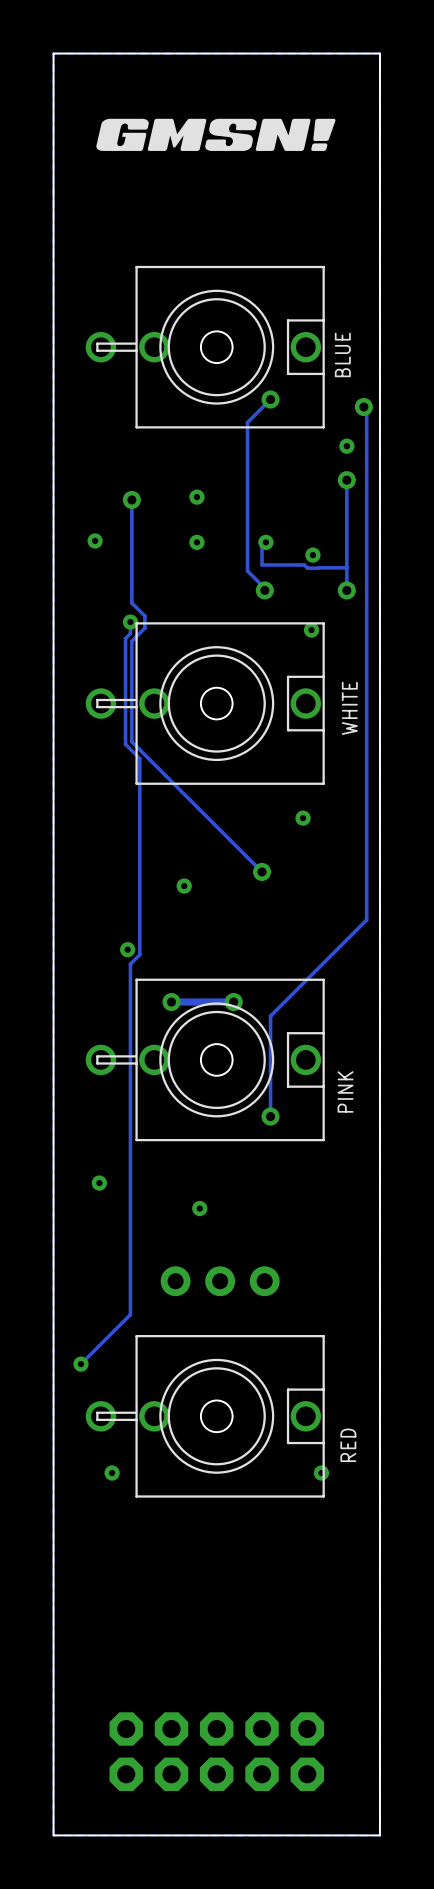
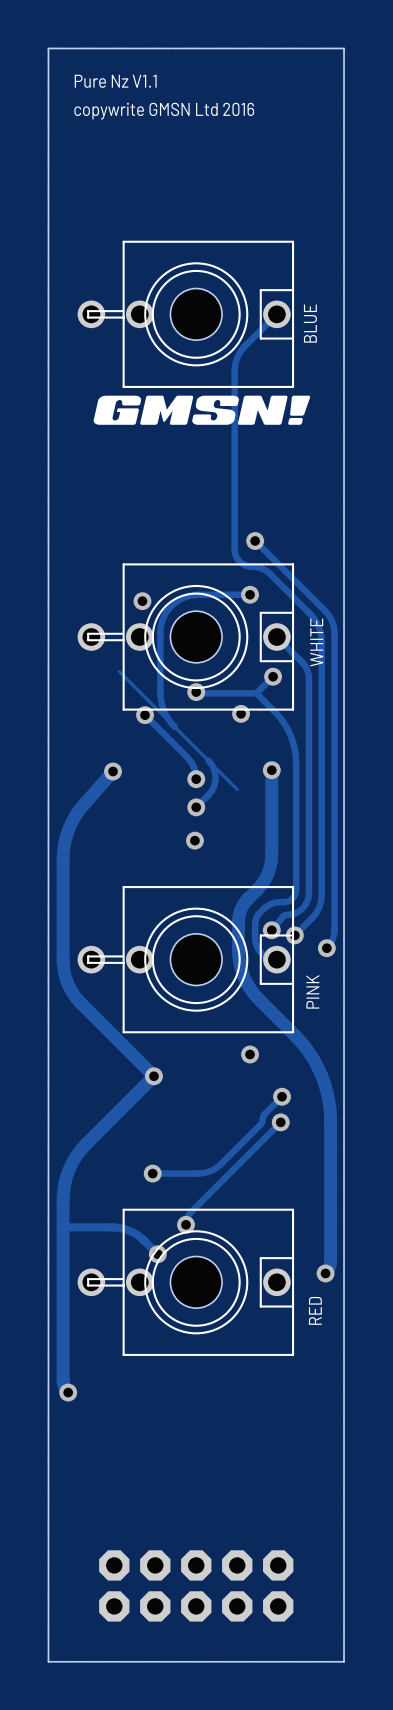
text: none -> Pure Nz V1.1 (115, 81)
text: none -> copywrite GMSN Ltd 2016 (164, 111)
drawing position: (215, 134) -> (201, 410)
BLUE footprint: [85, 265, 325, 429] -> [77, 240, 295, 388]
hole: none -> (196, 314)
track: none -> (276, 314) (241, 349) (234, 366) (234, 549) (236, 557) (241, 563) (267, 572) (310, 613) (316, 622) (321, 636) (321, 899) (314, 915) (294, 935)
track: (270, 399) (247, 422) (247, 570) (264, 590) -> none
via: (270, 399) -> none
track: (363, 406) (366, 409) (366, 919) (270, 1016) (270, 1116) -> none
via: (363, 406) -> none
via: (346, 446) -> none
track: (346, 480) (346, 590) -> none
via: (346, 480) -> none
via: (196, 497) -> none
track: (131, 499) (131, 603) (144, 616) (144, 628) (131, 641) (131, 741) -> none
via: (131, 499) -> none
via: (95, 540) -> none
via: (196, 542) -> none
track: (265, 542) (262, 546) (262, 564) (304, 564) (307, 568) (346, 567) -> none
via: (265, 542) -> none
via: (312, 555) -> none
via: (264, 590) -> none
via: (346, 590) -> none
track: none -> (255, 540) (325, 611) (333, 627) (334, 929) (332, 939) (326, 948)
via: none -> (255, 540)
WHITE footprint: [85, 622, 325, 785] -> [77, 563, 295, 711]
track: (130, 622) (130, 633) (125, 638) (125, 744) (139, 758) (139, 954) (130, 964) (130, 1314) (80, 1364) -> none
via: (130, 622) -> none
via: (311, 630) -> none
track: none -> (250, 594) (188, 596) (175, 602) (165, 613) (160, 632) (160, 698) (164, 711) (174, 726)
via: none -> (250, 594)
via: none -> (142, 601)
hole: none -> (196, 637)
track: none -> (276, 637) (303, 663) (308, 676) (308, 893) (307, 901) (302, 908) (295, 913) (283, 916) (271, 930)
track: none -> (273, 676) (256, 693)
via: none -> (273, 676)
track: none -> (196, 692) (256, 693)
via: none -> (196, 692)
track: none -> (256, 693) (283, 722) (290, 735) (295, 755) (295, 893) (288, 901) (274, 902) (265, 907) (258, 914) (255, 922) (255, 940) (258, 948) (266, 956) (276, 959)
via: none -> (241, 713)
track: none -> (145, 715) (189, 760) (193, 767) (196, 779)
via: none -> (145, 715)
via: (303, 818) -> none
track: none -> (208, 760) (214, 771) (214, 784) (210, 792) (196, 807)
track: none -> (271, 770) (271, 861) (265, 879) (244, 902) (239, 913) (238, 956) (243, 976) (250, 988) (307, 1049) (321, 1074) (327, 1093) (330, 1121) (330, 1261) (325, 1273)
via: none -> (271, 770)
track: none -> (113, 771) (76, 813) (66, 835) (63, 859) (63, 968) (67, 983) (75, 997) (153, 1076) (81, 1149) (72, 1162) (66, 1177) (63, 1200) (63, 1380) (68, 1392)
via: none -> (113, 771)
via: none -> (196, 779)
via: (262, 871) -> none
via: (184, 886) -> none
via: none -> (196, 807)
via: none -> (194, 840)
via: (127, 949) -> none
PINK footprint: [85, 978, 325, 1142] -> [77, 886, 295, 1034]
via: (171, 1002) -> none
track: (233, 1002) (171, 1002) -> none
via: (233, 1002) -> none
via: none -> (271, 930)
via: none -> (294, 935)
via: none -> (326, 948)
hole: none -> (196, 959)
via: (270, 1116) -> none
via: none -> (250, 1054)
via: (99, 1183) -> none
via: none -> (153, 1076)
via: (199, 1208) -> none
track: none -> (282, 1096) (264, 1114) (260, 1124) (213, 1169) (201, 1173) (152, 1173)
via: none -> (282, 1096)
track: none -> (280, 1122) (191, 1211) (186, 1224)
via: none -> (280, 1122)
part: (220, 1281) -> none
via: none -> (152, 1173)
RED footprint: [85, 1335, 325, 1498] -> [77, 1208, 295, 1356]
via: none -> (186, 1224)
track: none -> (63, 1227) (123, 1228) (139, 1236) (157, 1254)
via: (80, 1364) -> none
via: none -> (157, 1254)
via: none -> (325, 1273)
hole: none -> (196, 1282)
via: (112, 1473) -> none
via: (321, 1473) -> none
via: none -> (68, 1392)

